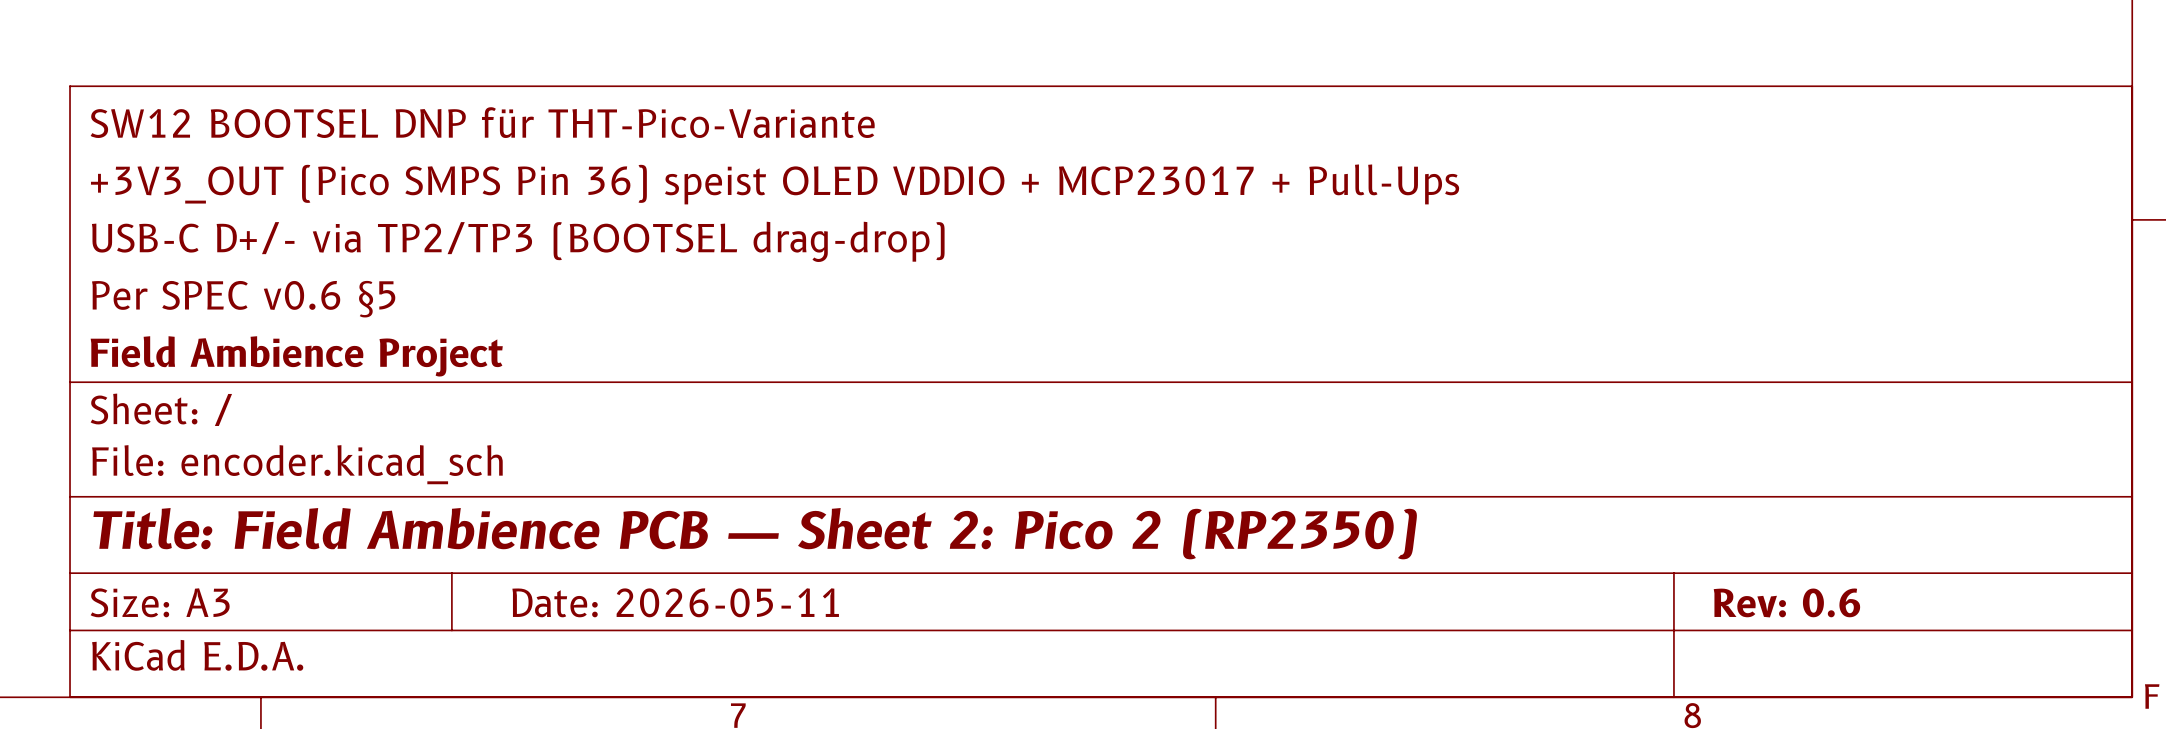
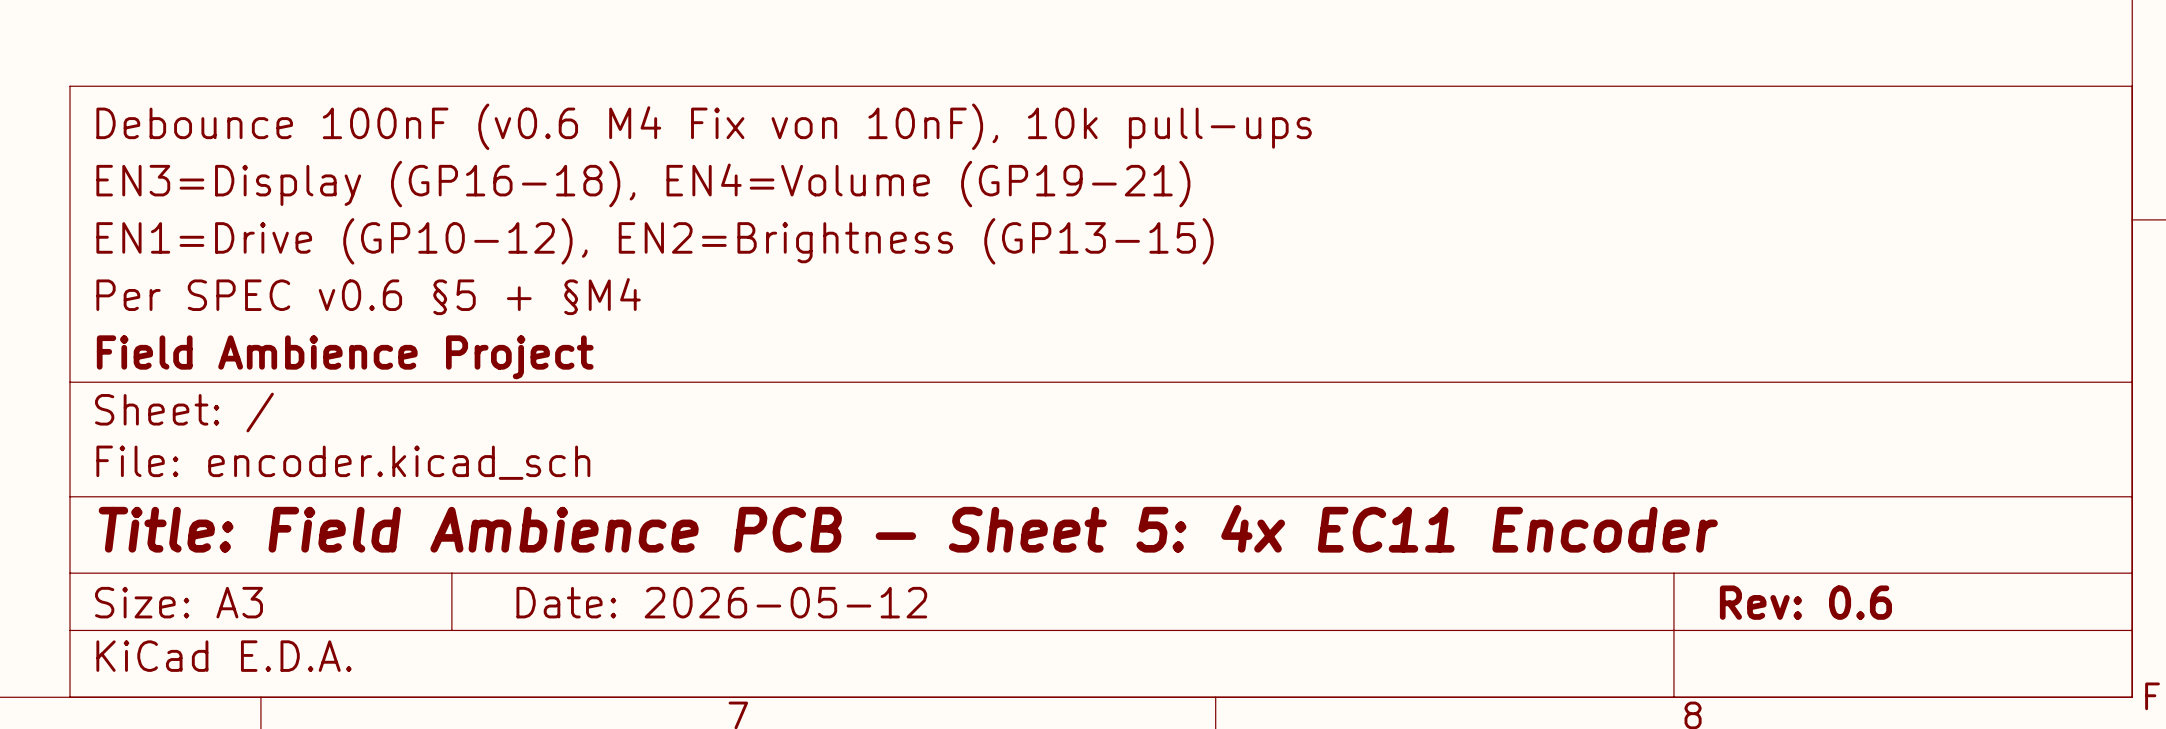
title block: SW12 BOOTSEL DNP für THT-Pico-Variante (482, 122) -> Debounce 100nF (v0.6 M4 Fix von 10nF), 10k pull-ups (704, 126)
title block: +3V3_OUT (Pico SMPS Pin 36) speist OLED VDDIO + MCP23017 + Pull-Ups (775, 184) -> EN3=Display (GP16-18), EN4=Volume (GP19-21) (643, 184)
title block: USB-C D+/- via TP2/TP3 (BOOTSEL drag-drop) (518, 241) -> EN1=Drive (GP10-12), EN2=Brightness (GP13-15) (654, 241)
title block: Per SPEC v0.6 §5 (243, 299) -> Per SPEC v0.6 §5 + §M4 (368, 296)
title block: Title: Field Ambience PCB — Sheet 2: Pico 2 (RP2350) (755, 533) -> Title: Field Ambience PCB — Sheet 5: 4x EC11 Encoder (908, 528)
title block: Date: 2026-05-11 (675, 602) -> Date: 2026-05-12 (721, 602)

